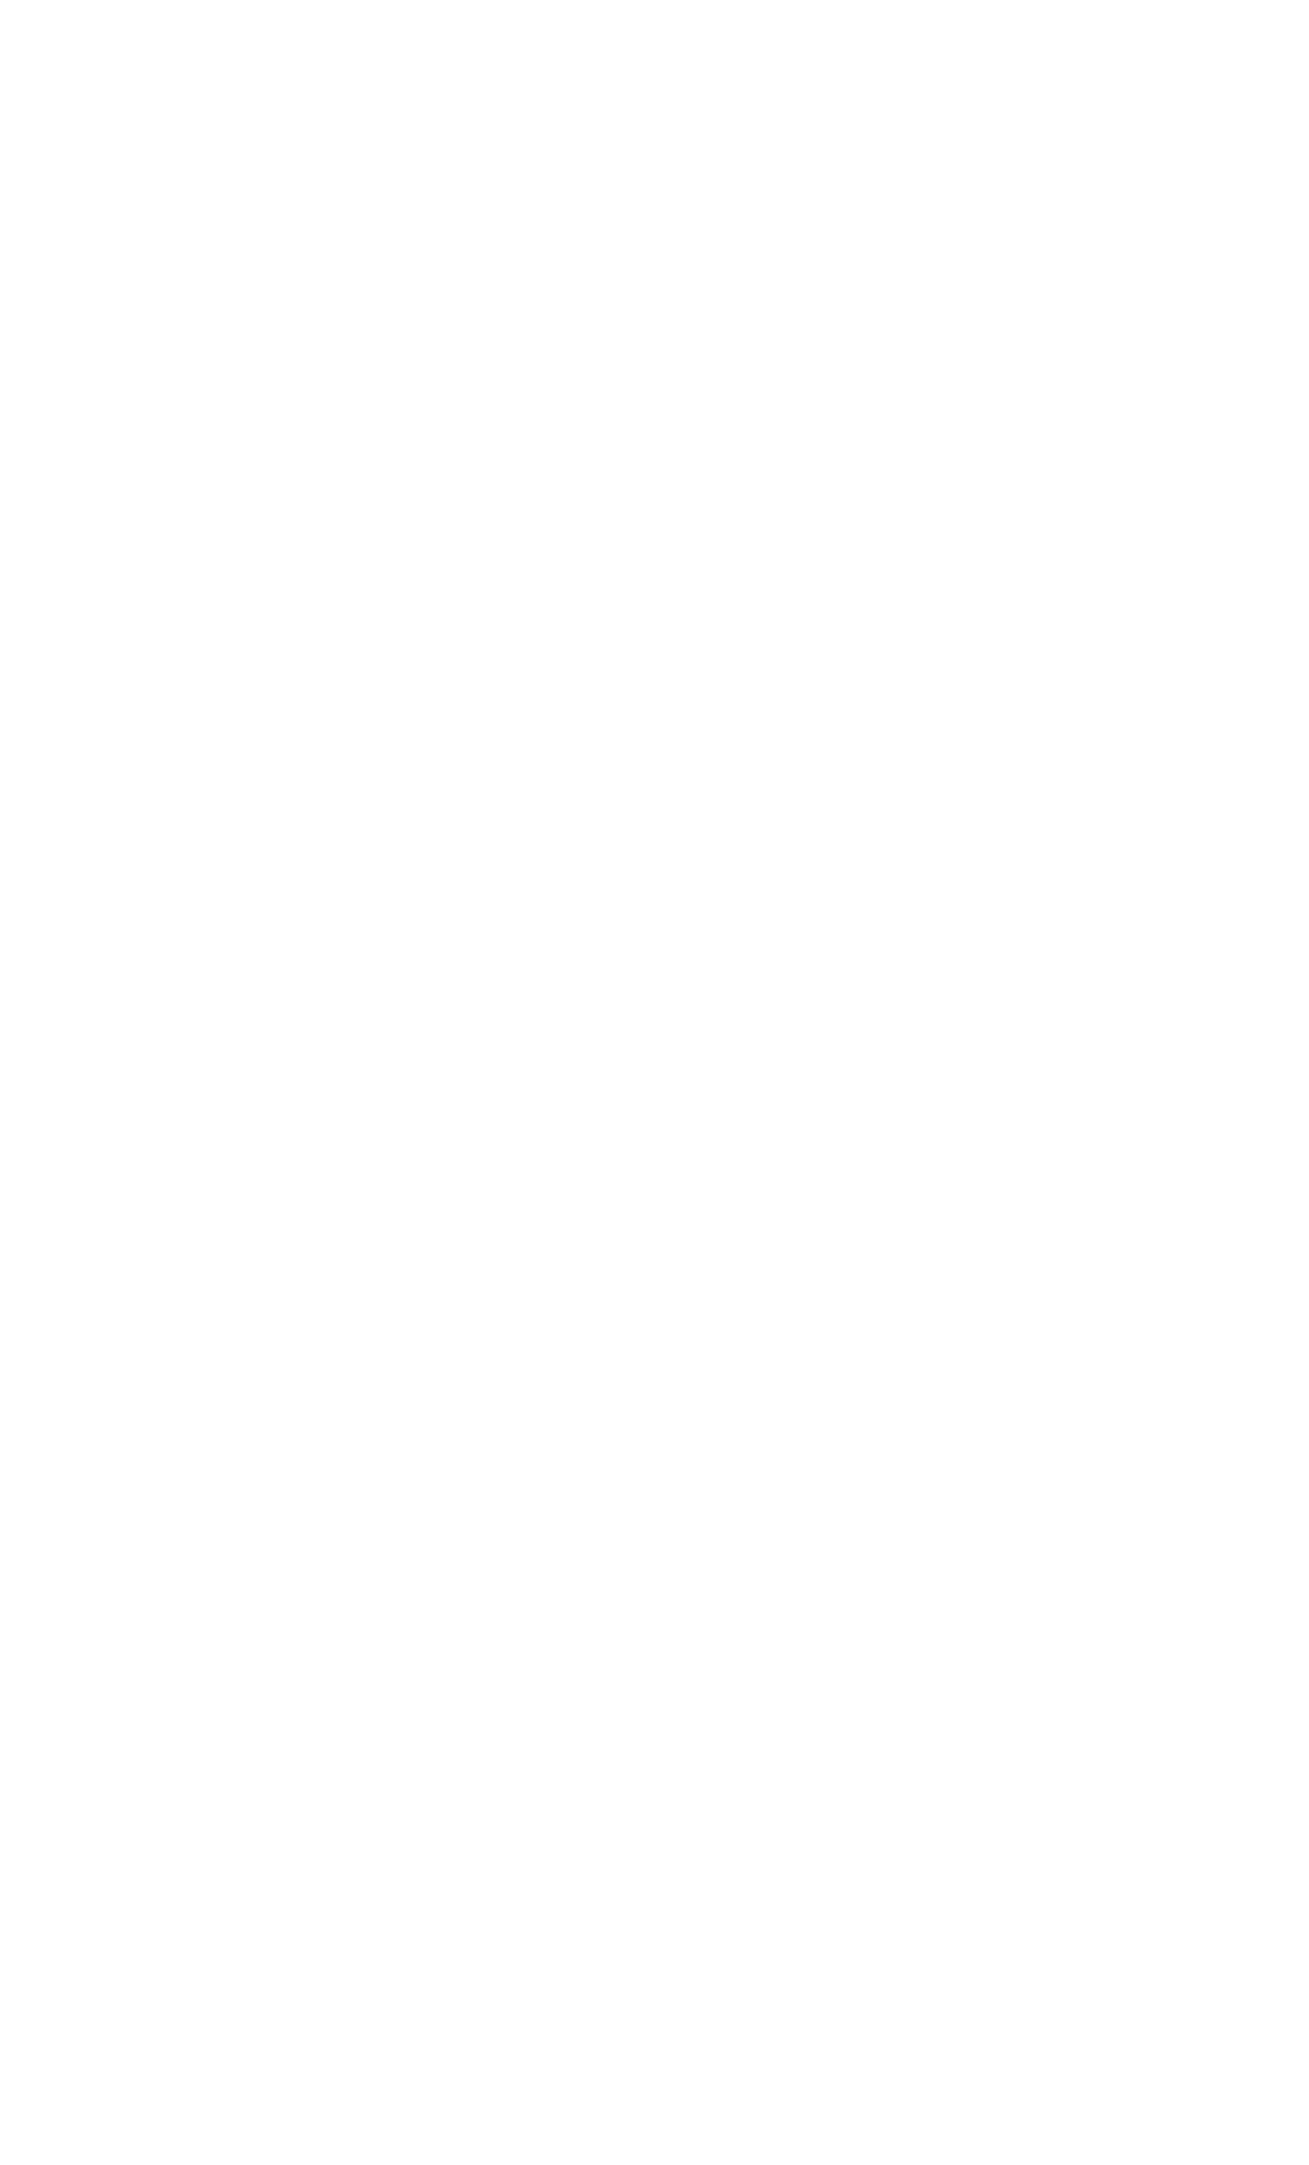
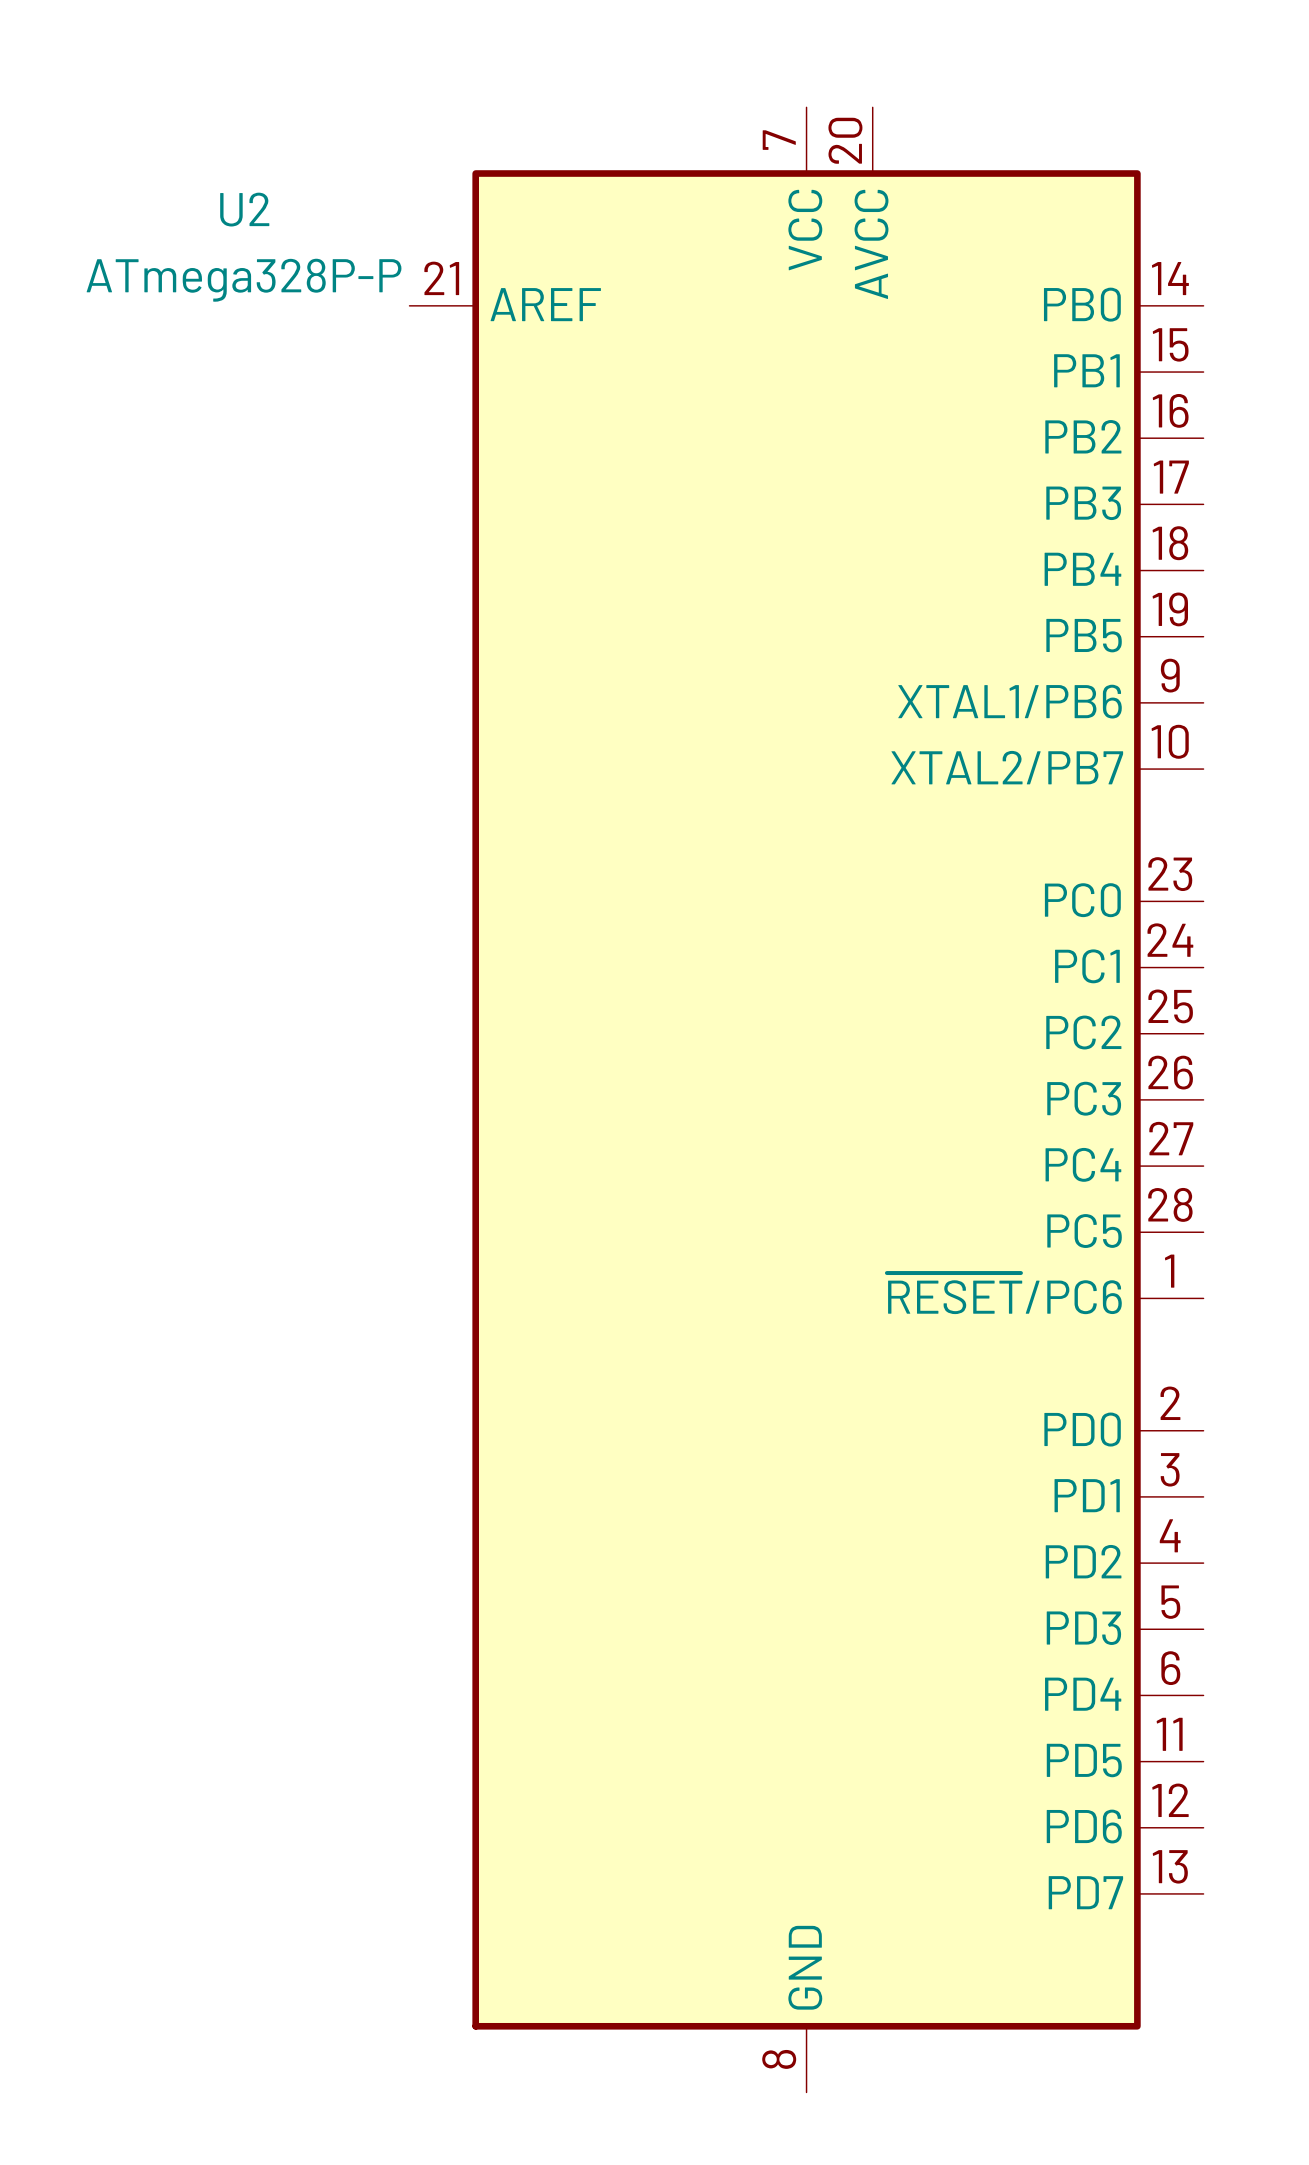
U2: none -> ATmega328P-P (806, 1099)

